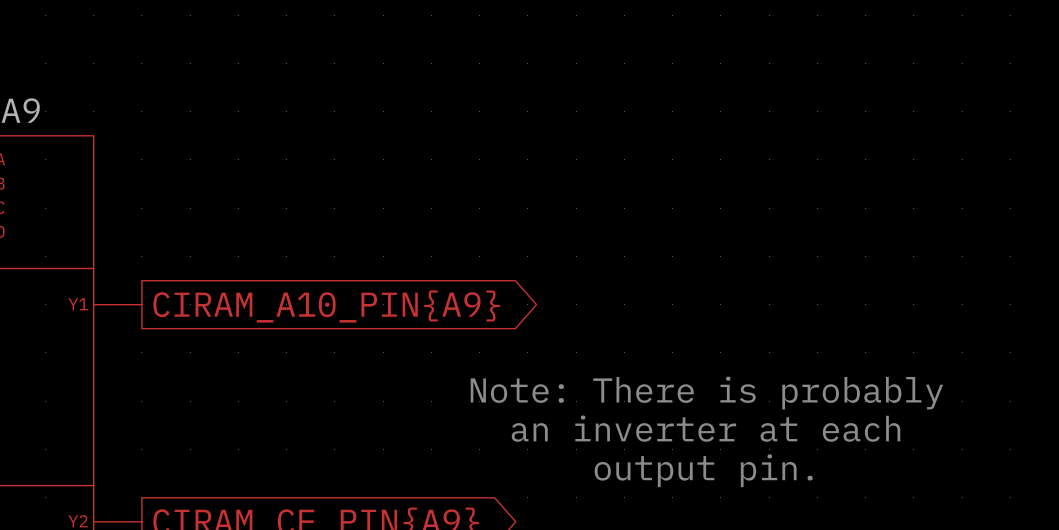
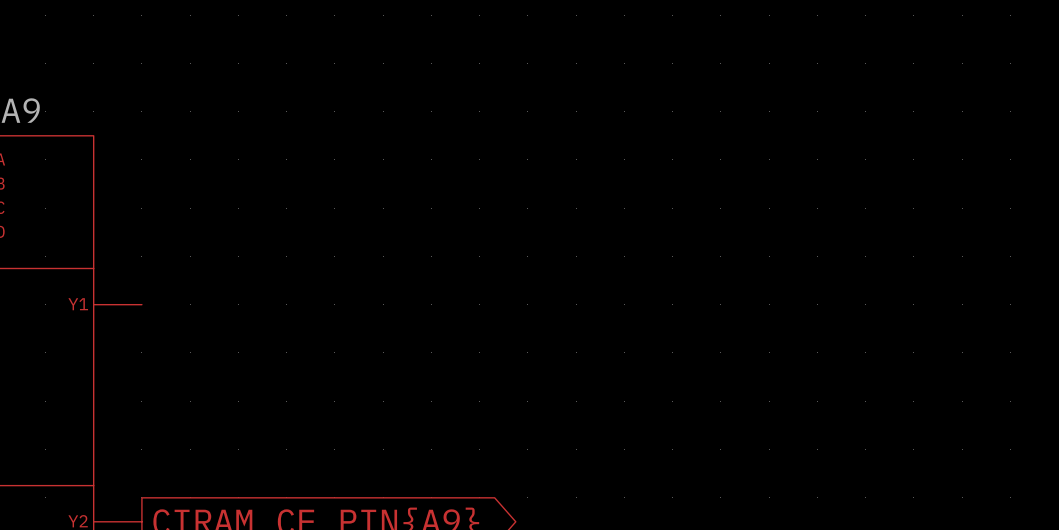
global label: CIRAM_A10_PIN{A9} (326, 306) -> none
text: Note: There is probably (706, 393) -> none
text: an inverter at each (705, 428) -> none
text: output pin. (703, 470) -> none

